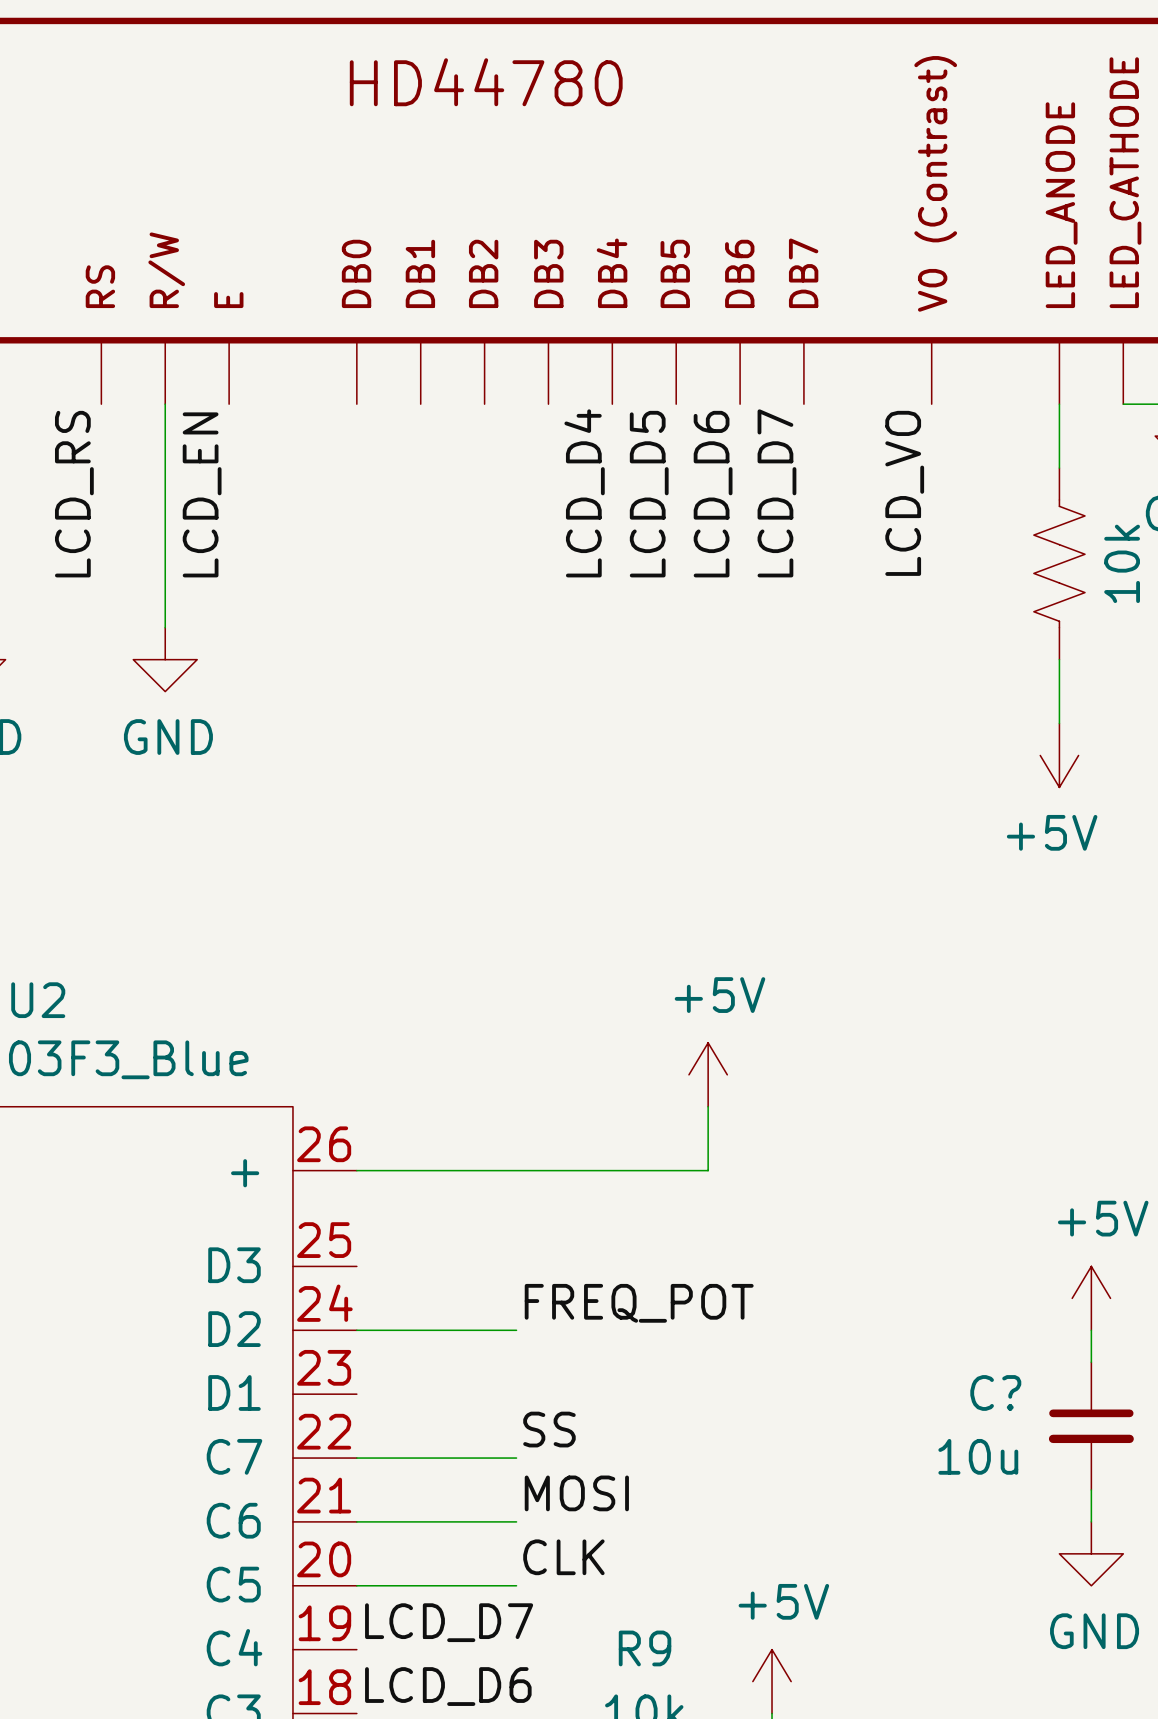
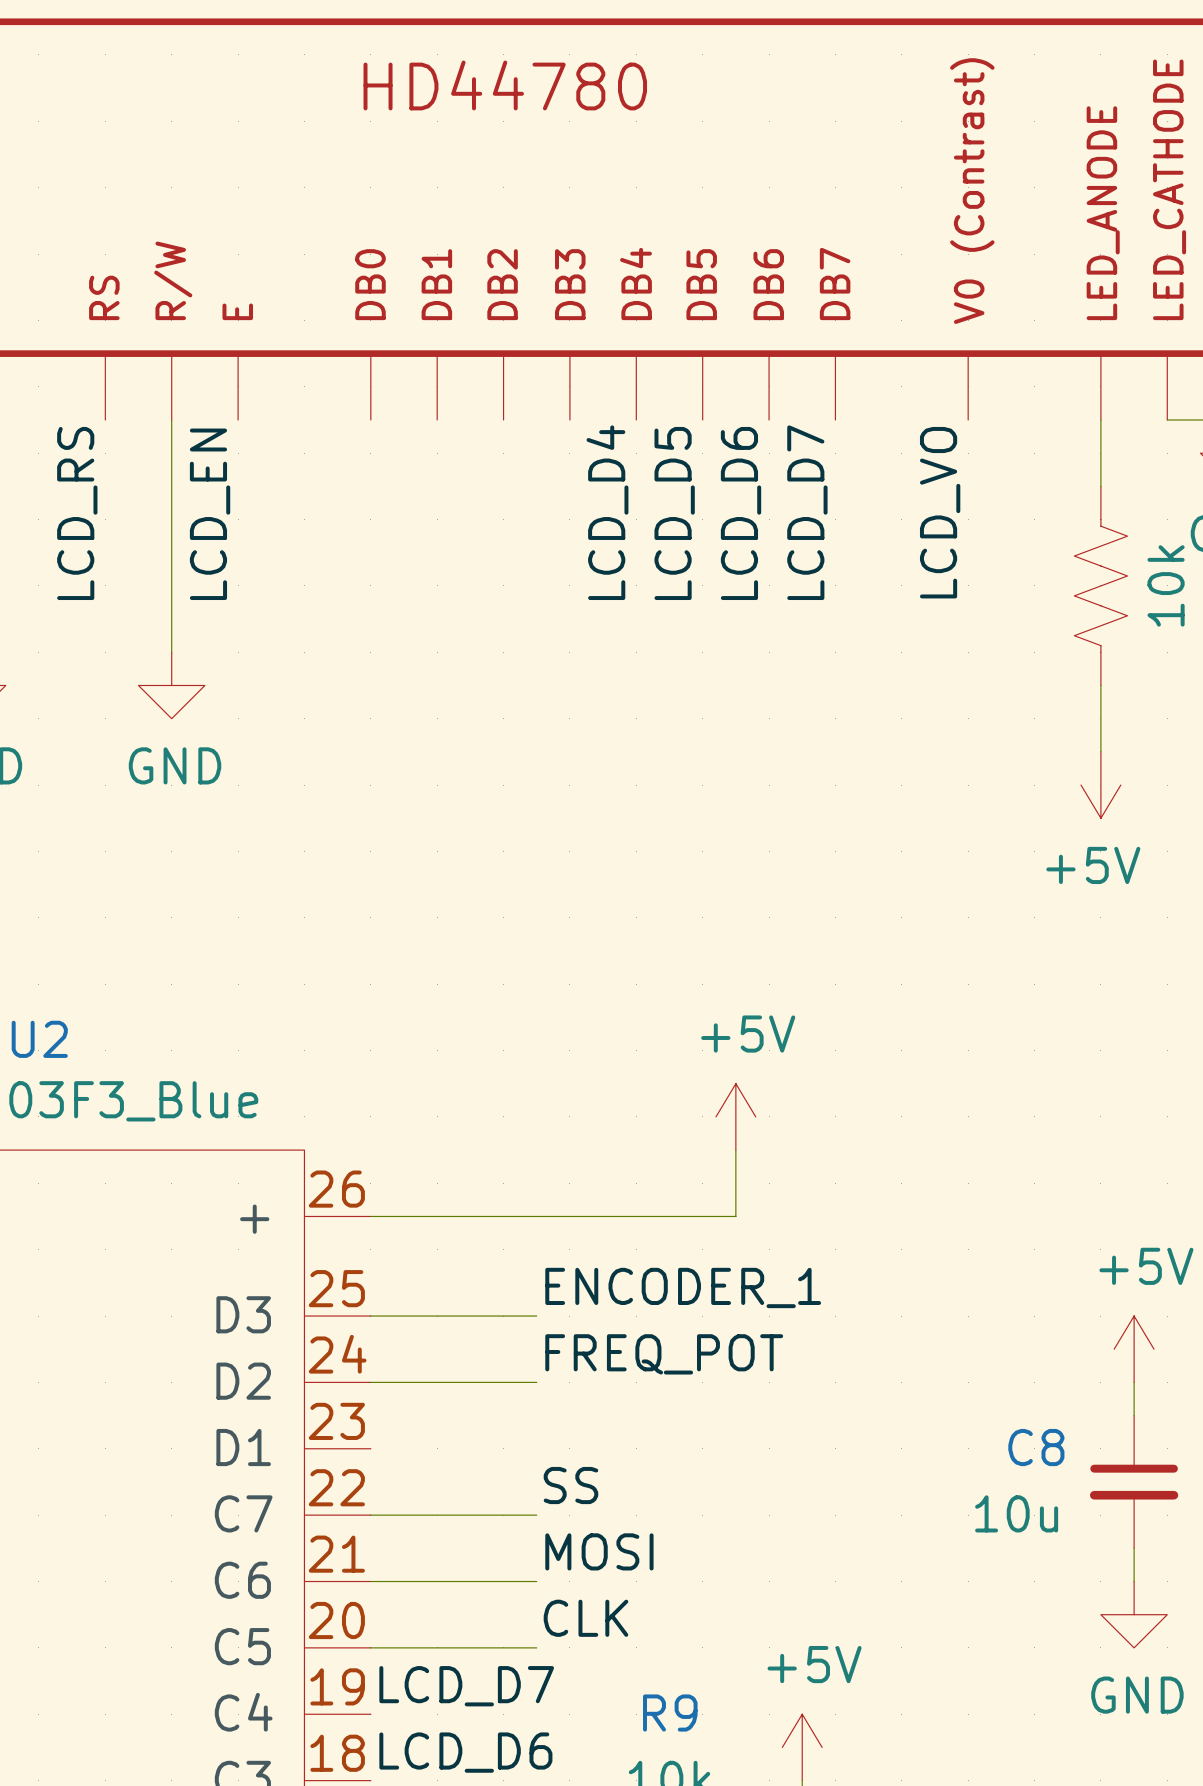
label: none -> ENCODER_1 (683, 1287)
wire: none -> (370, 1316) (536, 1316)
C? name: C? (995, 1392) -> C8 (1036, 1447)

